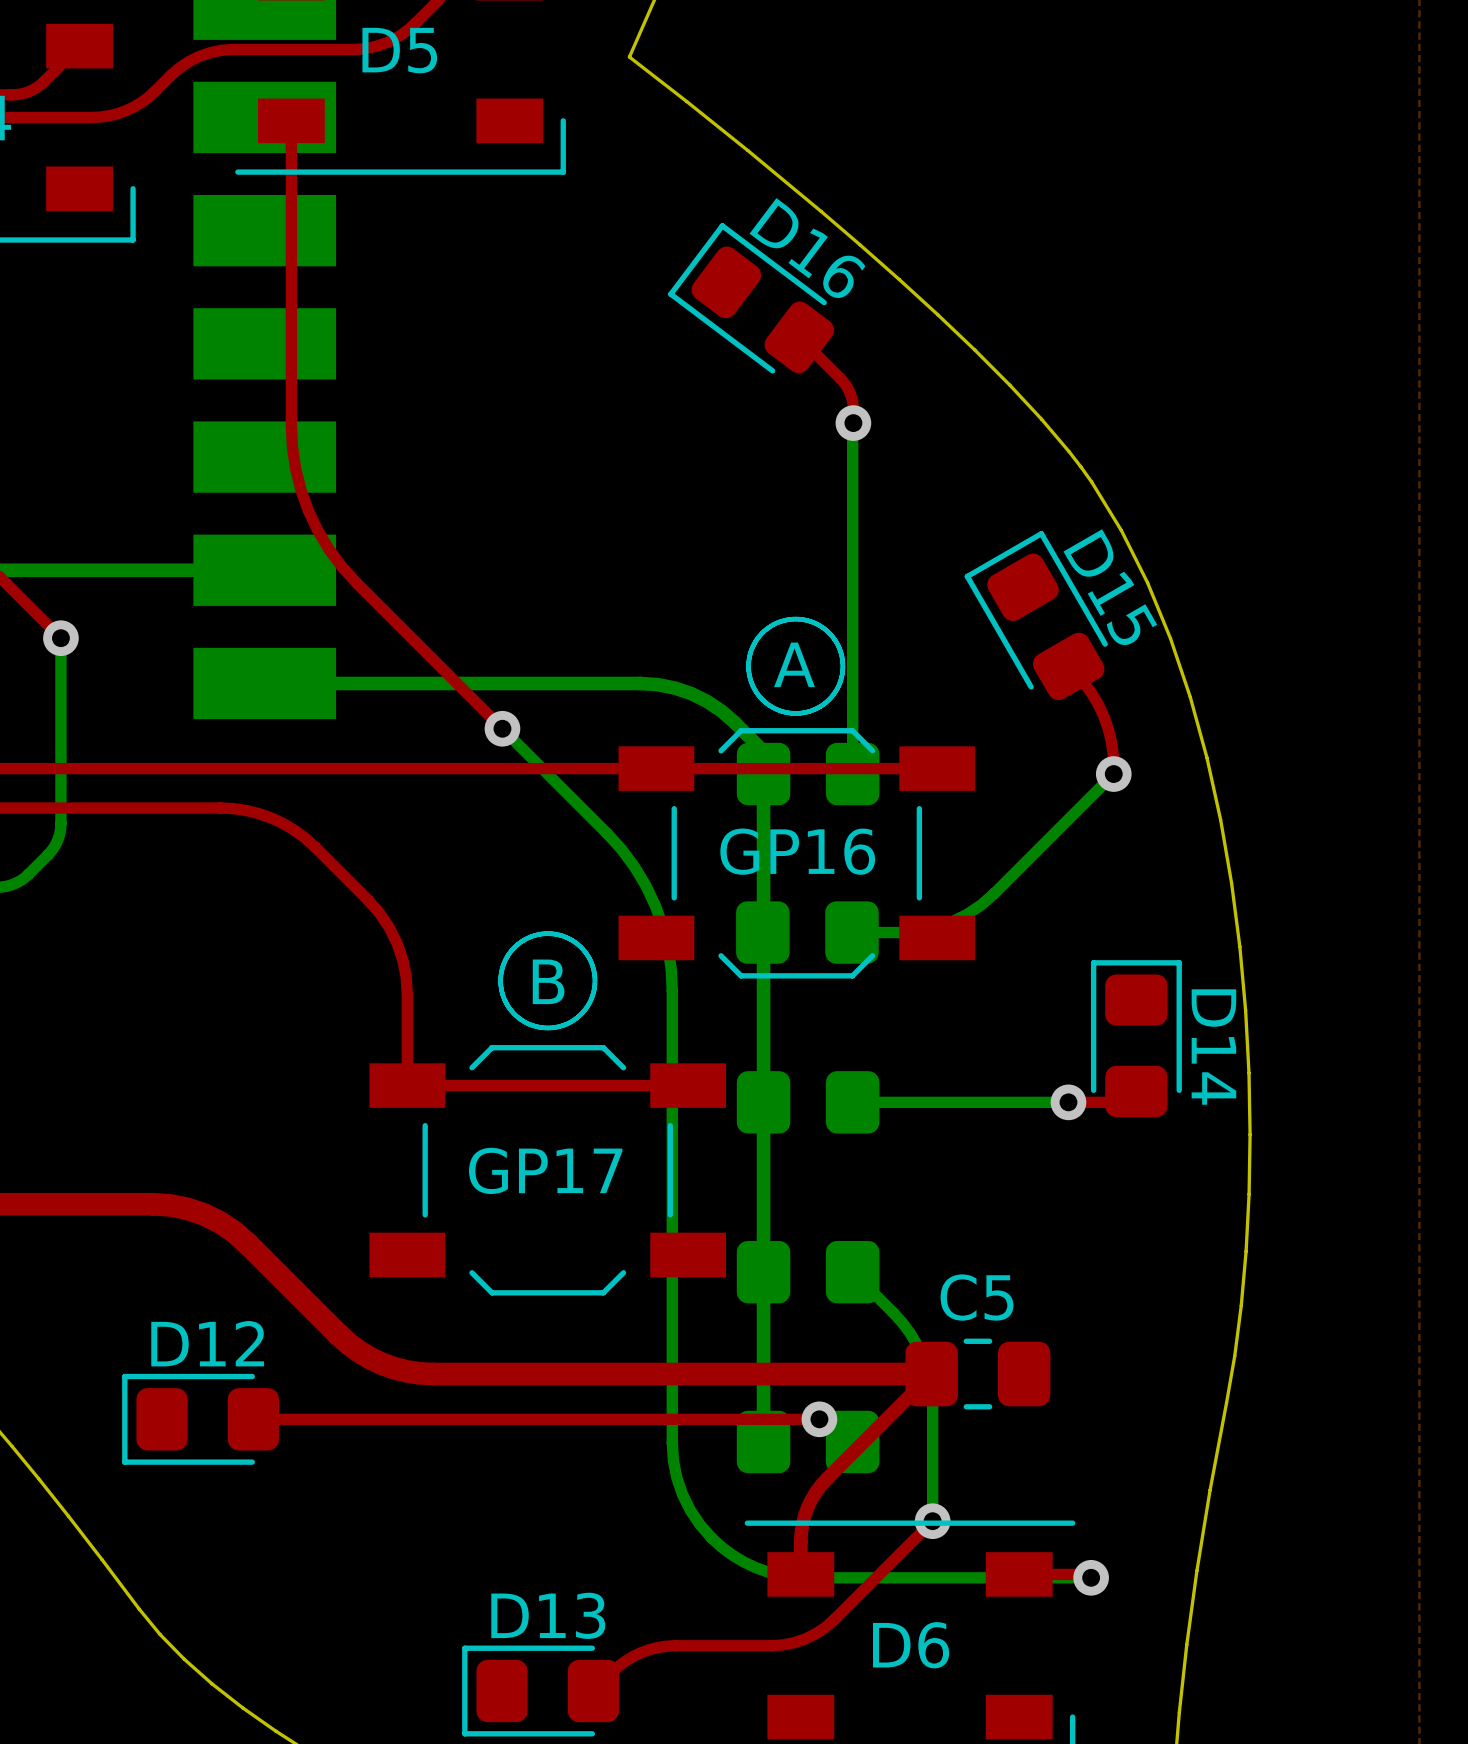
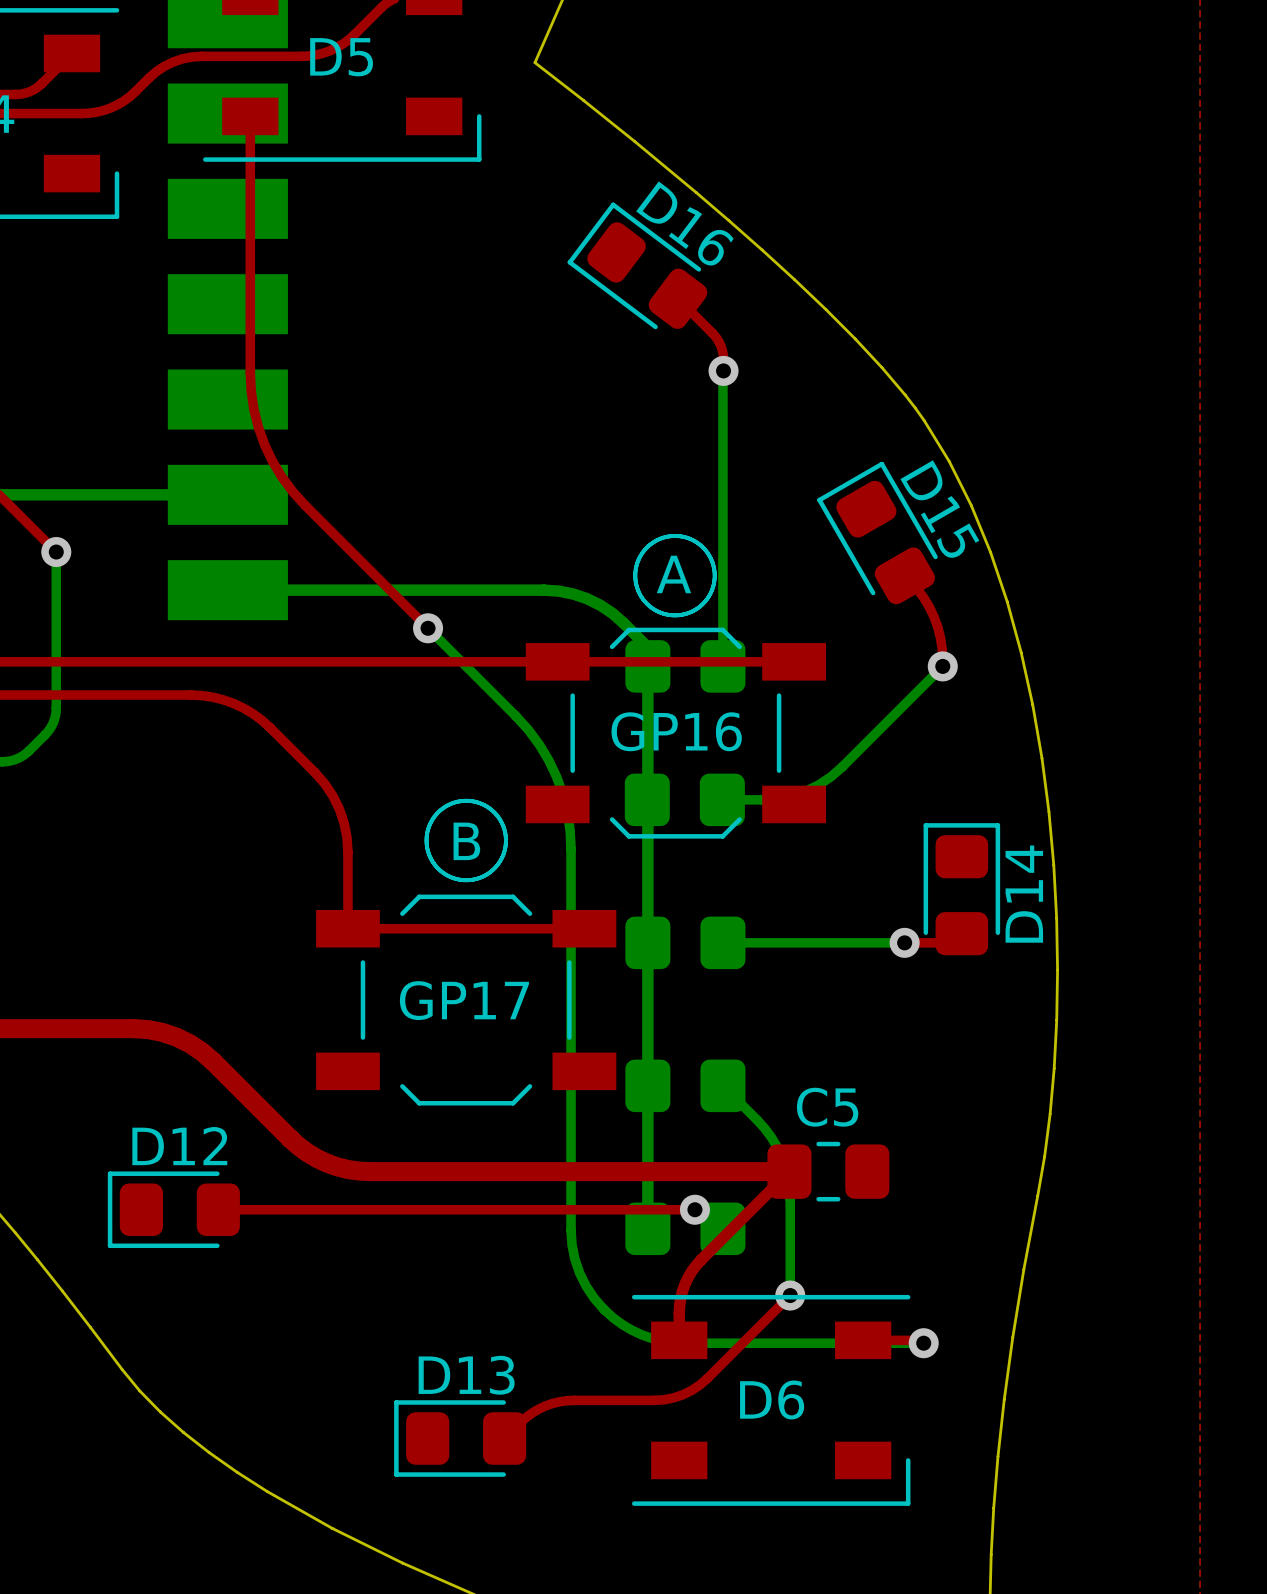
D14 name rotation: 0° (1213, 1047) -> 180° (1024, 894)

